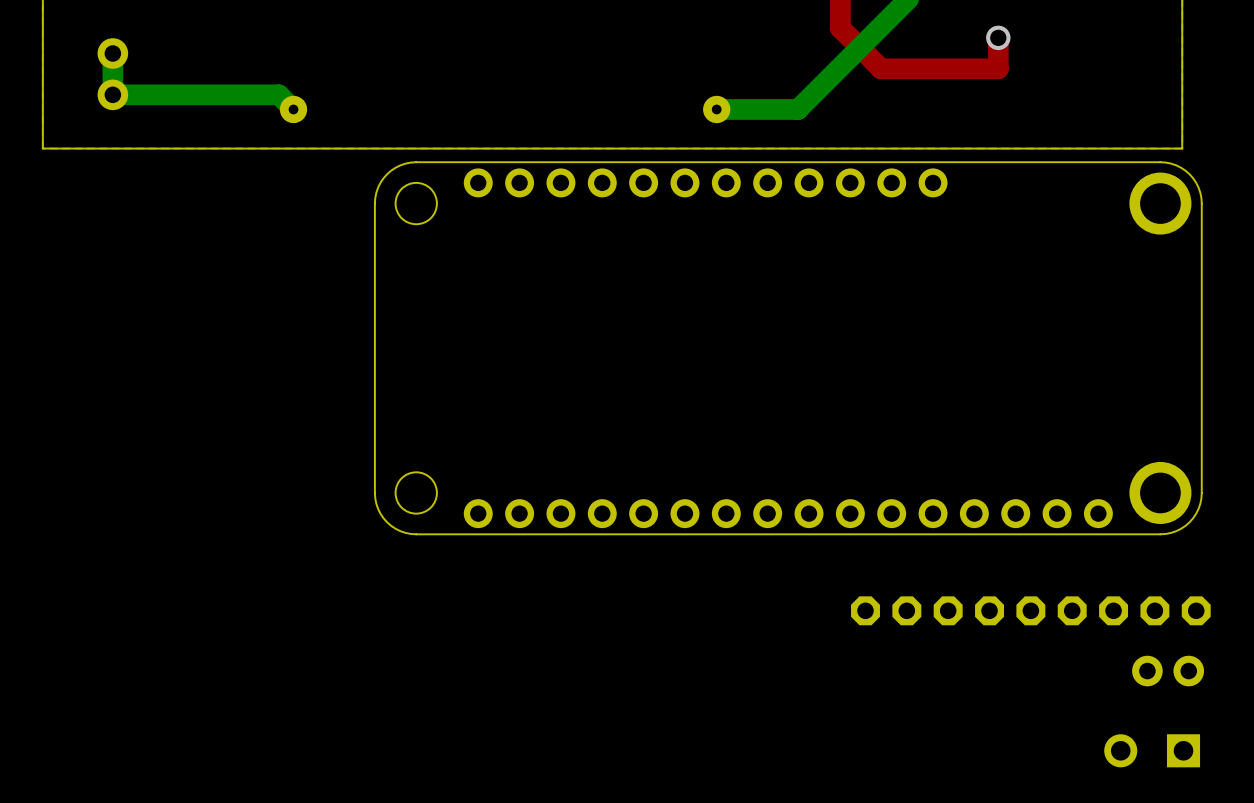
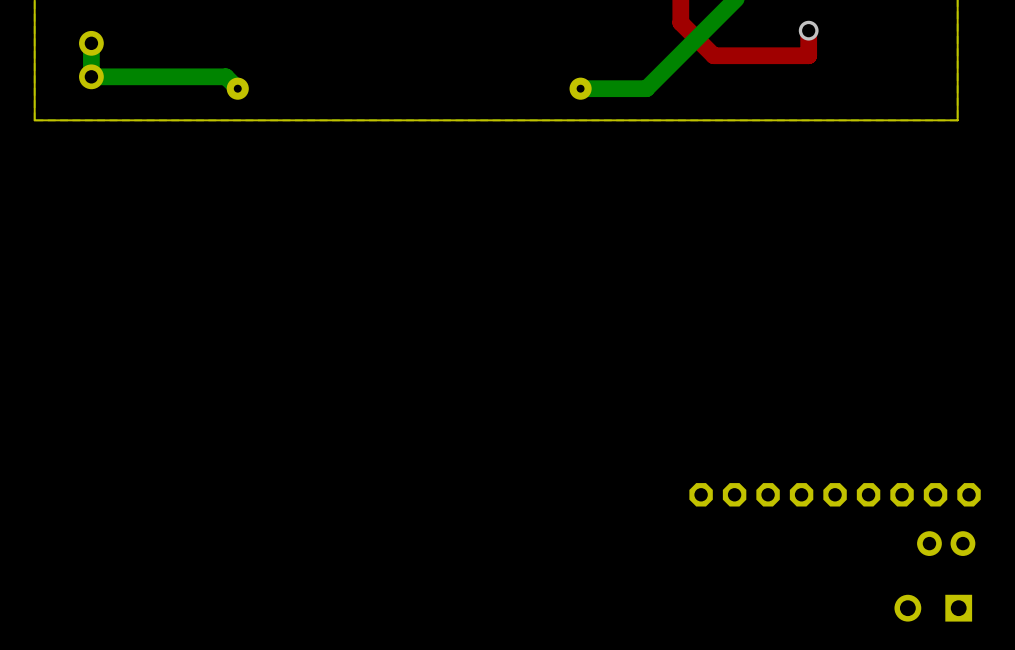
part: (788, 348) -> none

